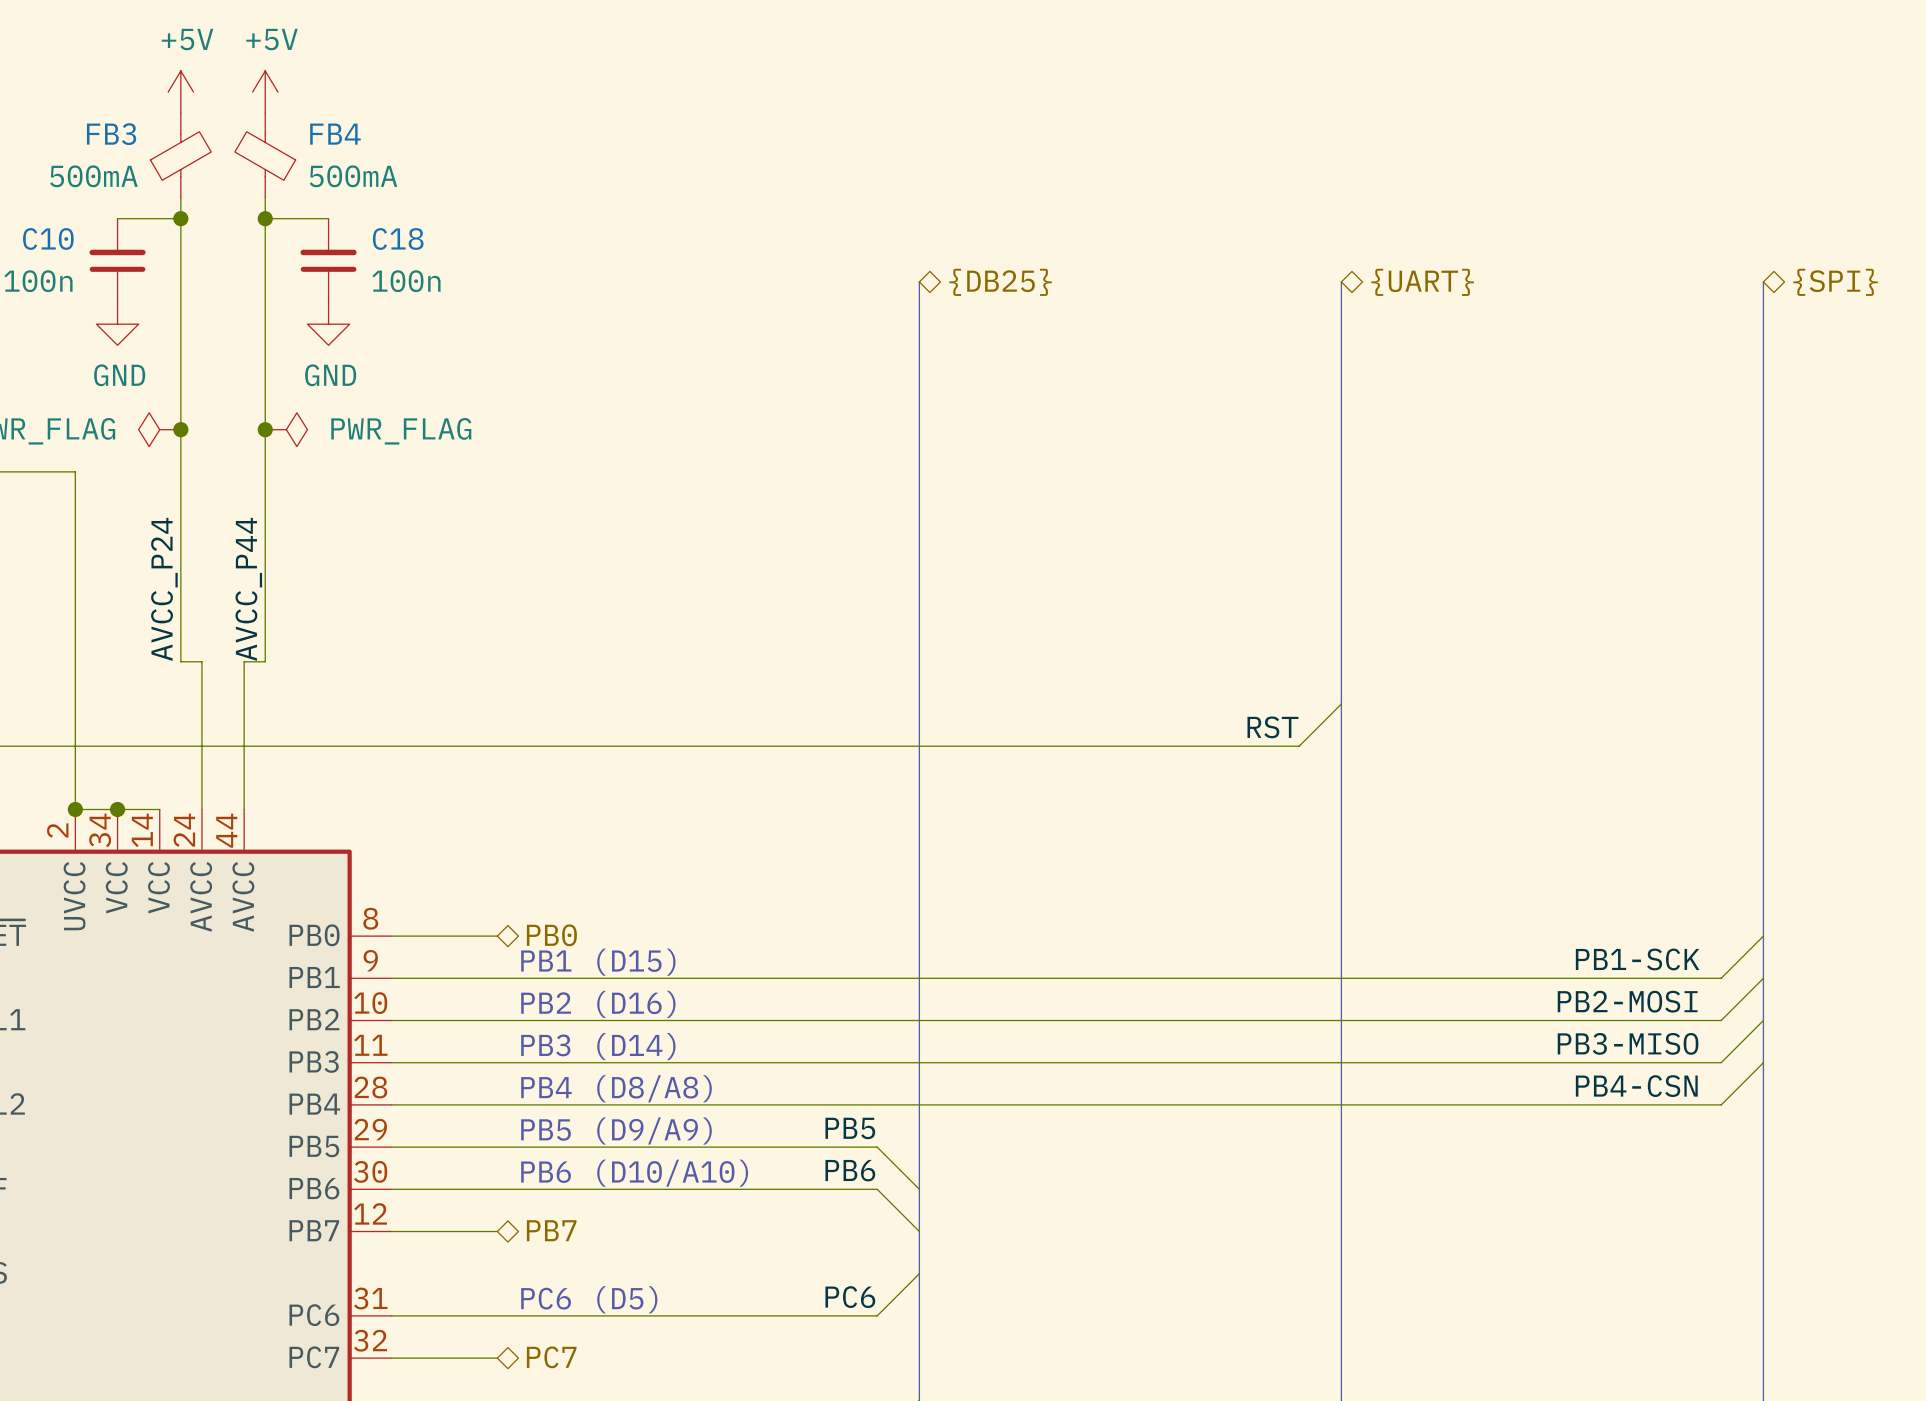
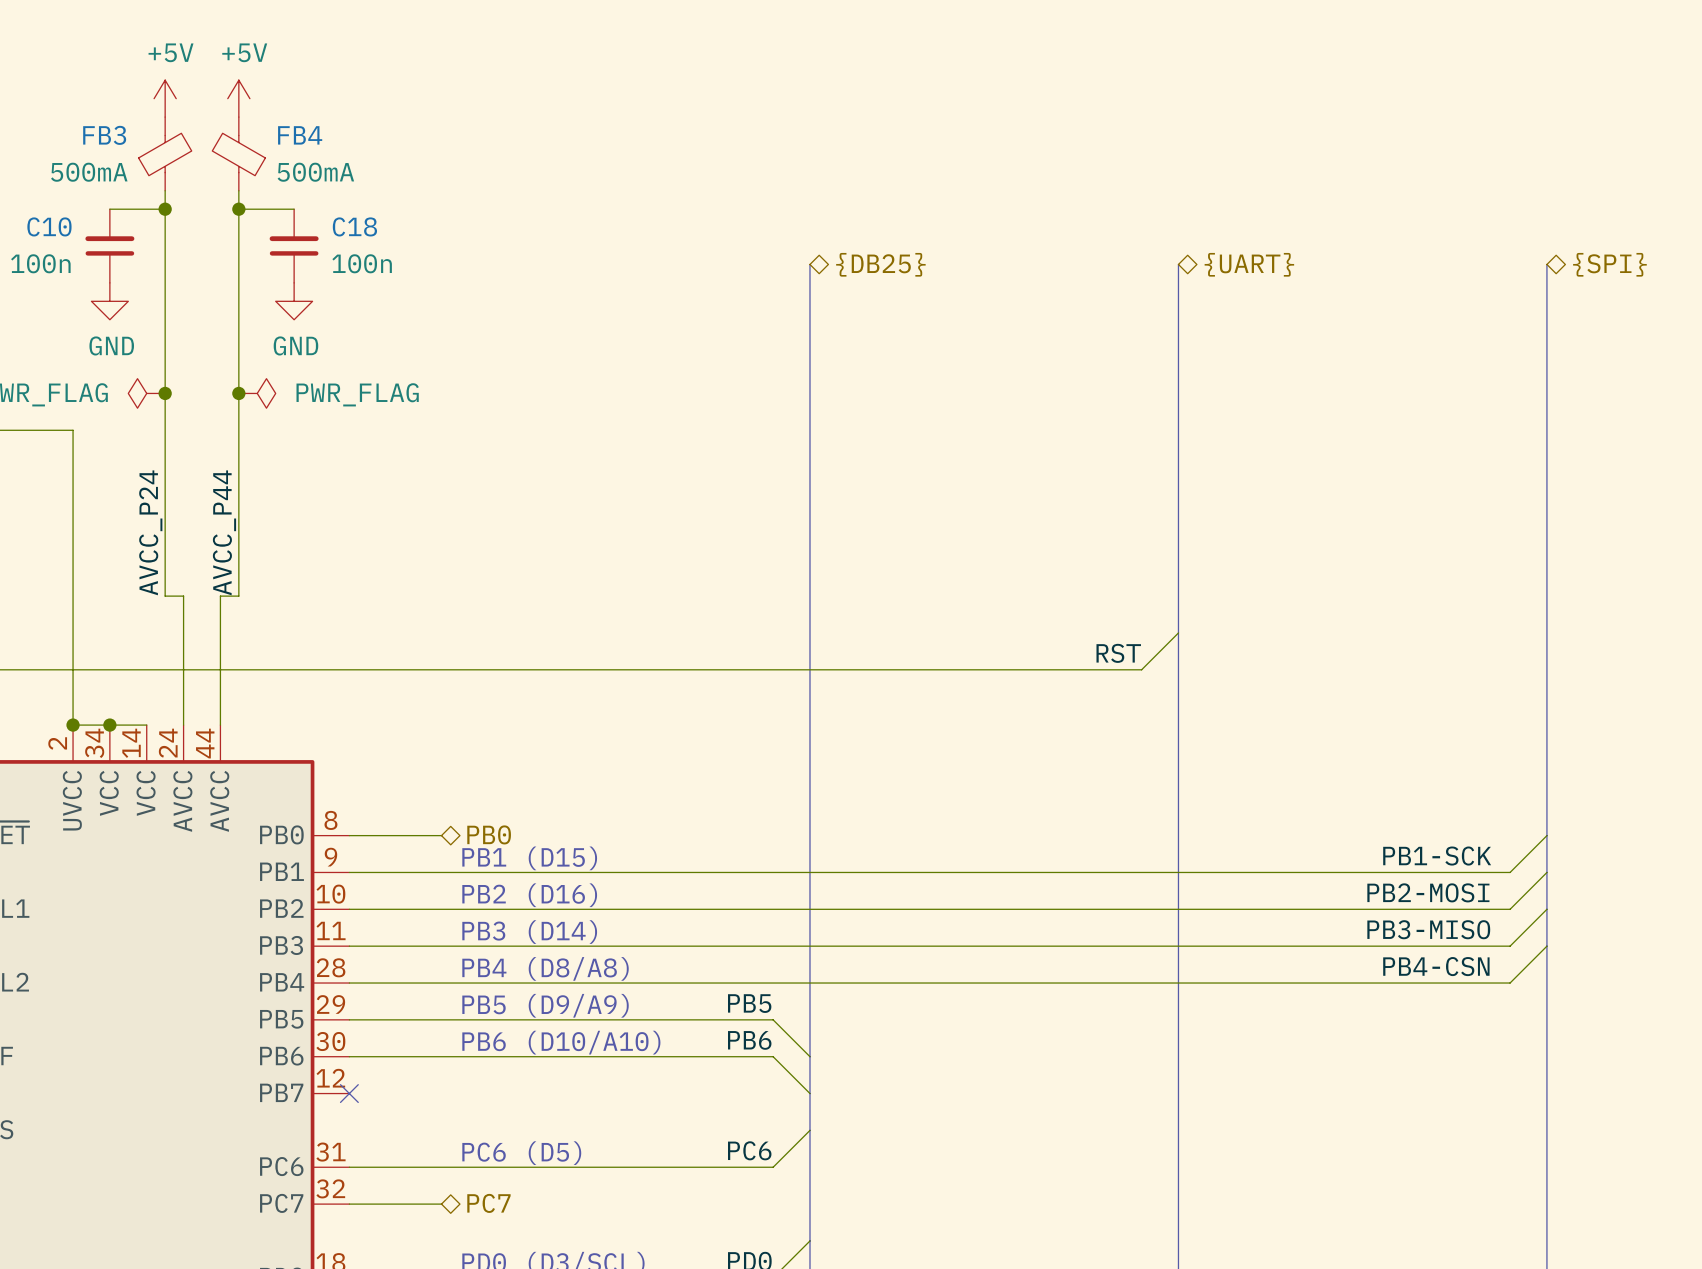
hierarchical label: PB7 (551, 1230) -> none
wire: (391, 1231) (497, 1231) -> none
no-connect mark: none -> (349, 1093)

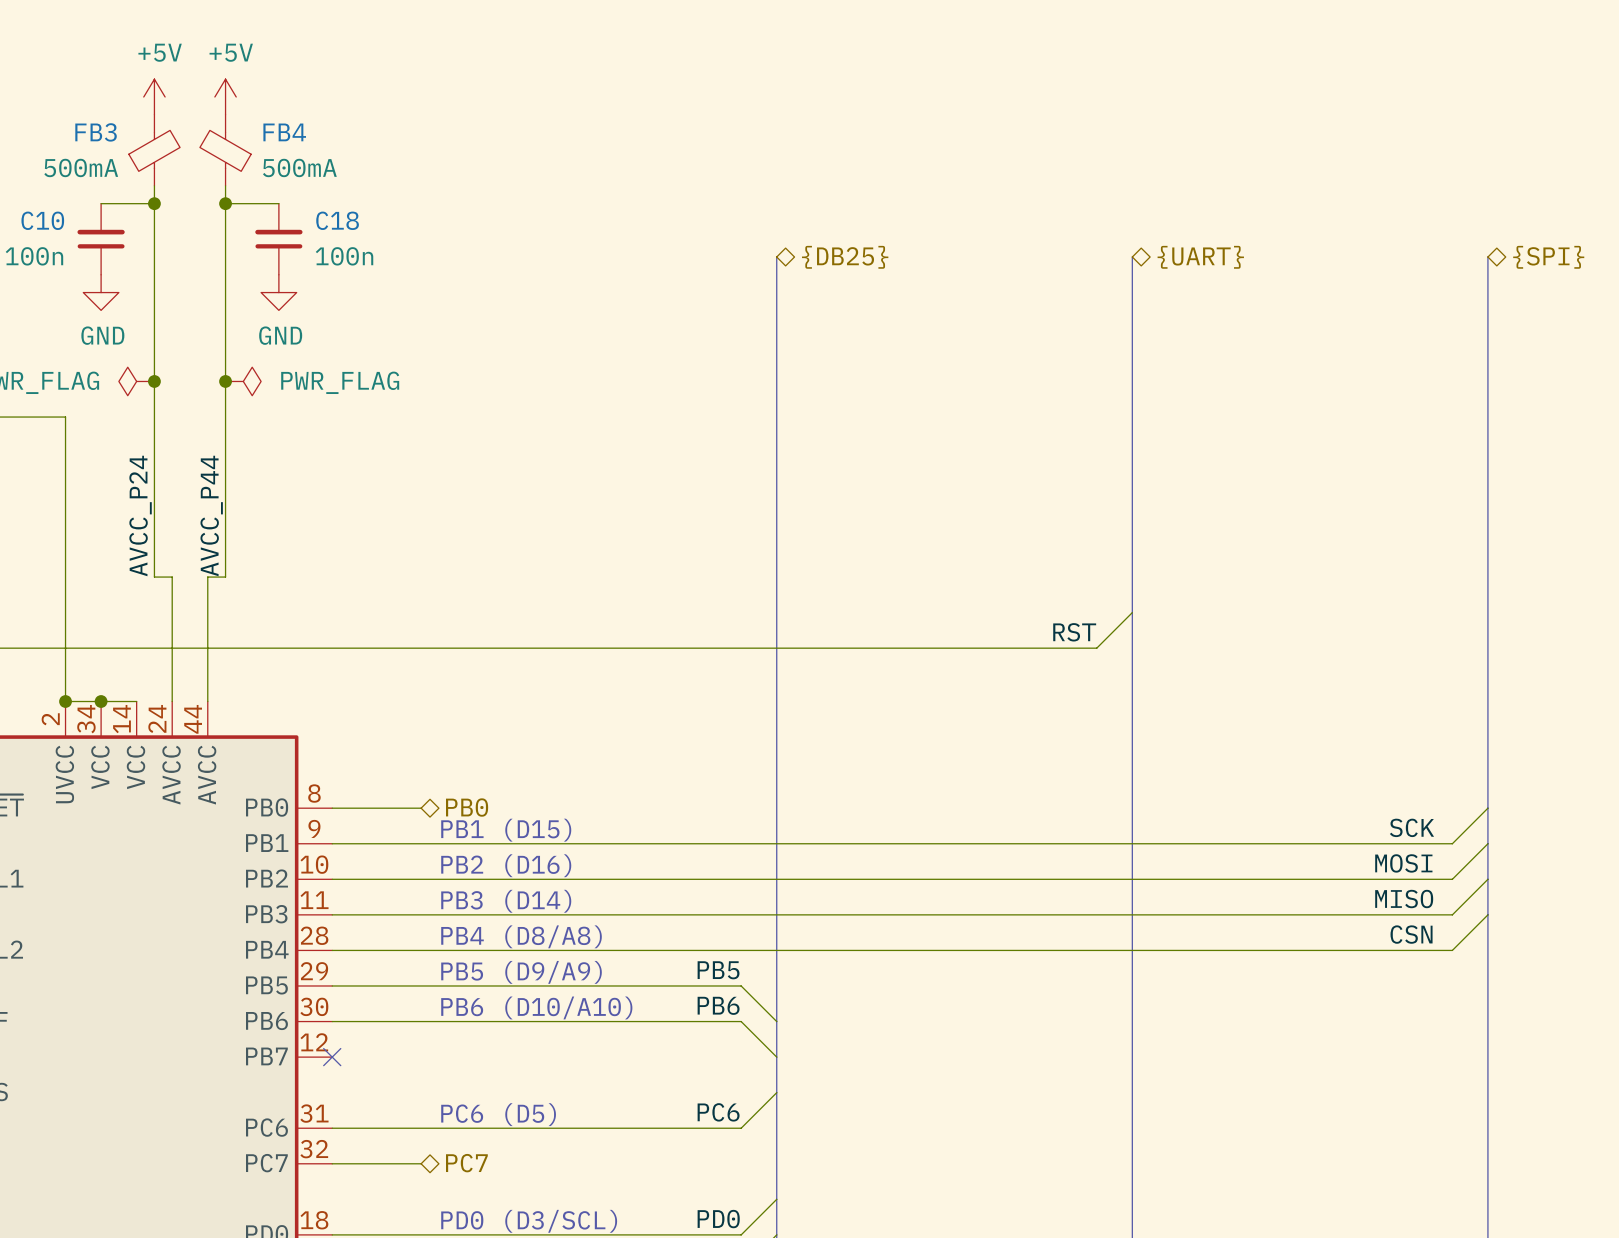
label: PB1-SCK (1437, 856) -> SCK (1411, 827)
label: PB2-MOSI (1428, 892) -> MOSI (1403, 863)
label: PB3-MISO (1428, 929) -> MISO (1404, 899)
label: PB4-CSN (1436, 966) -> CSN (1411, 934)

